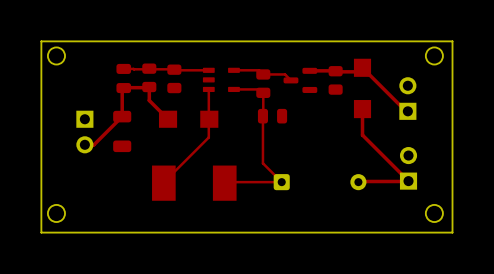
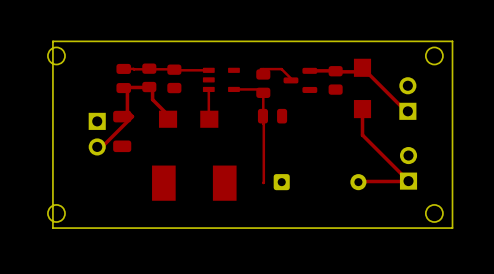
board edge: (52, 41) (41, 41) (41, 232) (452, 232) (452, 228) -> (52, 41) (52, 228) (452, 228)
top track: (235, 69) (259, 70) (263, 74) (285, 74) (290, 80) -> none
top track: none -> (260, 69) (281, 69) (290, 78)
top track: none -> (263, 109) (263, 183)
top track: (262, 116) (262, 163) (281, 182) (224, 183) -> none
top track: (168, 117) (168, 119) (149, 100) (149, 87) (123, 88) (122, 116) (94, 144) (84, 144) -> none
top track: none -> (172, 119) (152, 99) (152, 87) (128, 87) (127, 111) (132, 116) (102, 146) (97, 146)
top track: (209, 119) (208, 137) (163, 183) -> none
part position: (84, 132) -> (97, 134)

